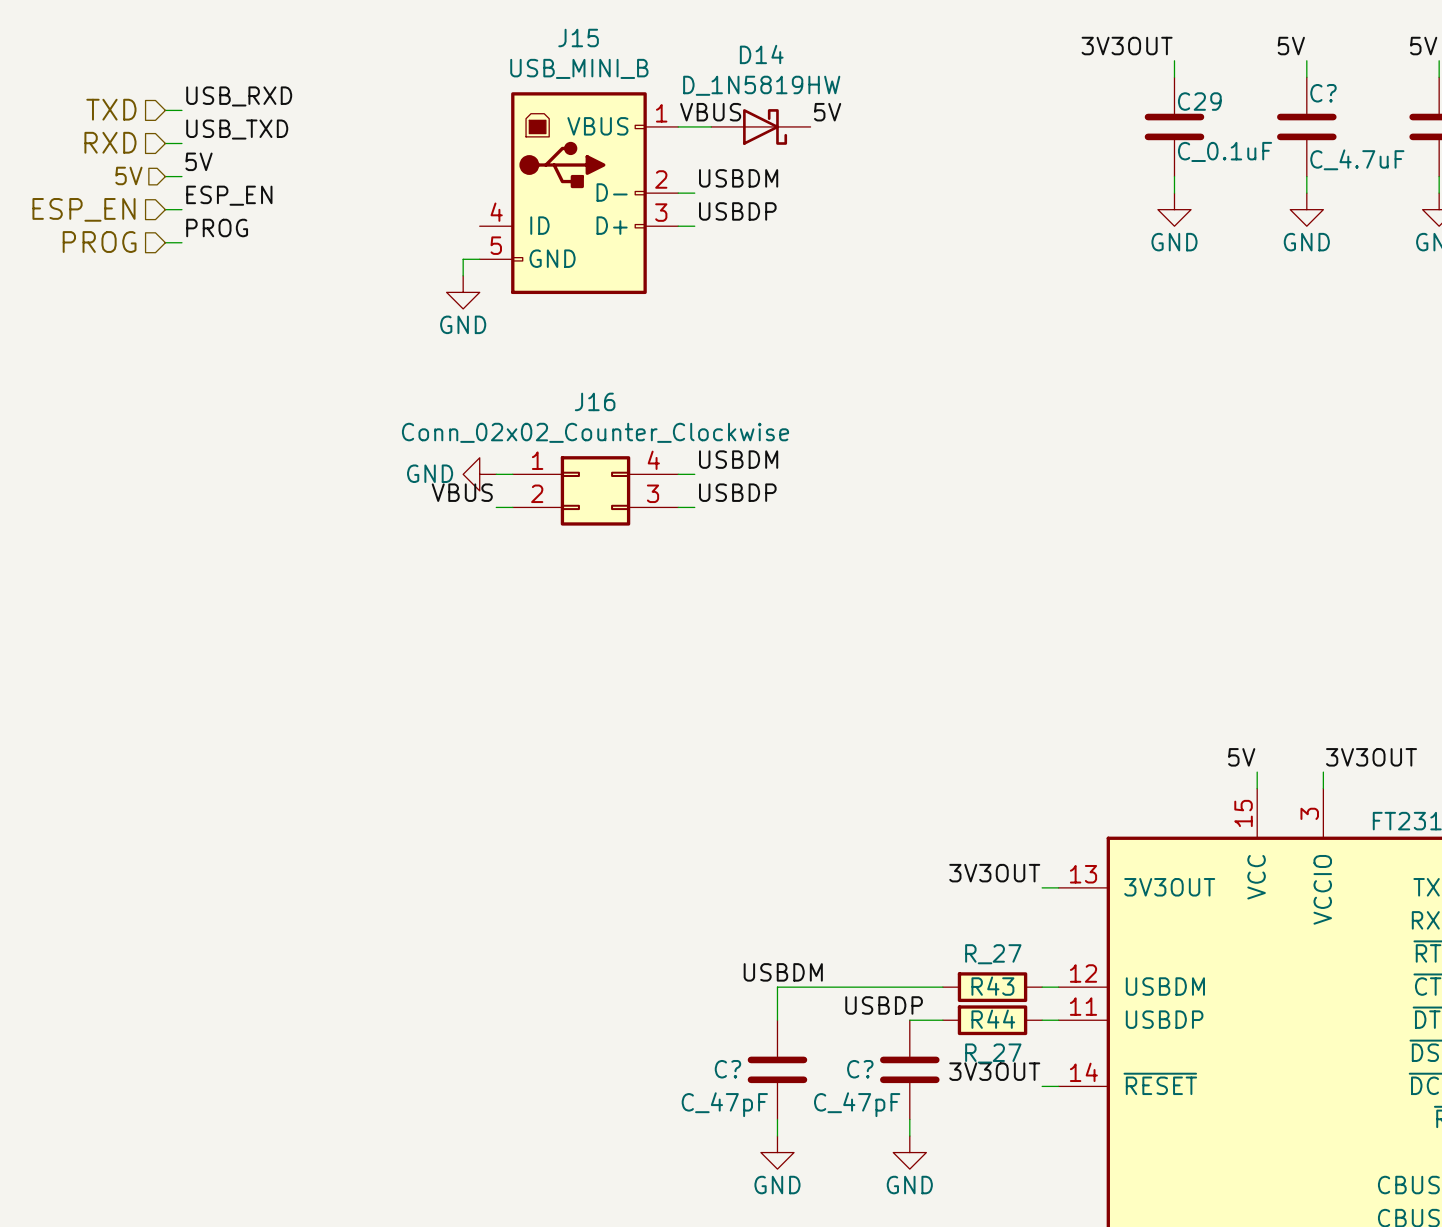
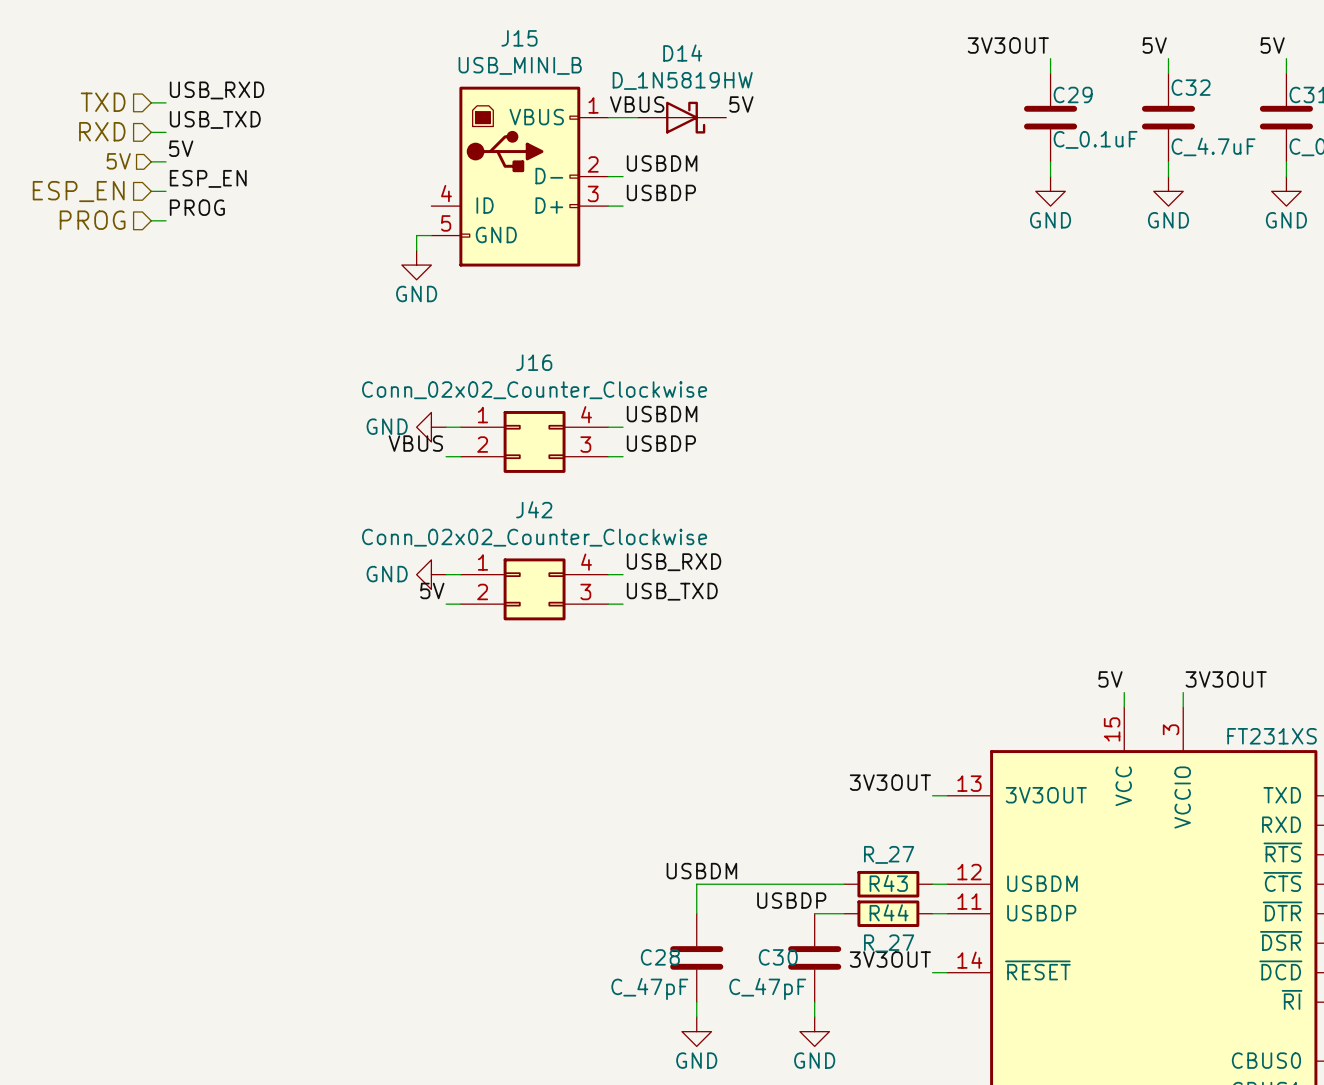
C? name: C? (1323, 93) -> C32 (1191, 87)
label: none -> USB_RXD (674, 562)
power symbol: none -> GND (431, 574)
wire: none -> (446, 574) (460, 574)
wire: none -> (608, 574) (623, 574)
J42: none -> Conn_02x02_Counter_Clockwise (534, 589)
label: none -> 5V (432, 590)
label: none -> USB_TXD (672, 591)
wire: none -> (446, 604) (460, 604)
wire: none -> (608, 604) (623, 604)
C? name: C? (727, 1069) -> C28 (660, 957)
C? name: C? (860, 1069) -> C30 (778, 957)

